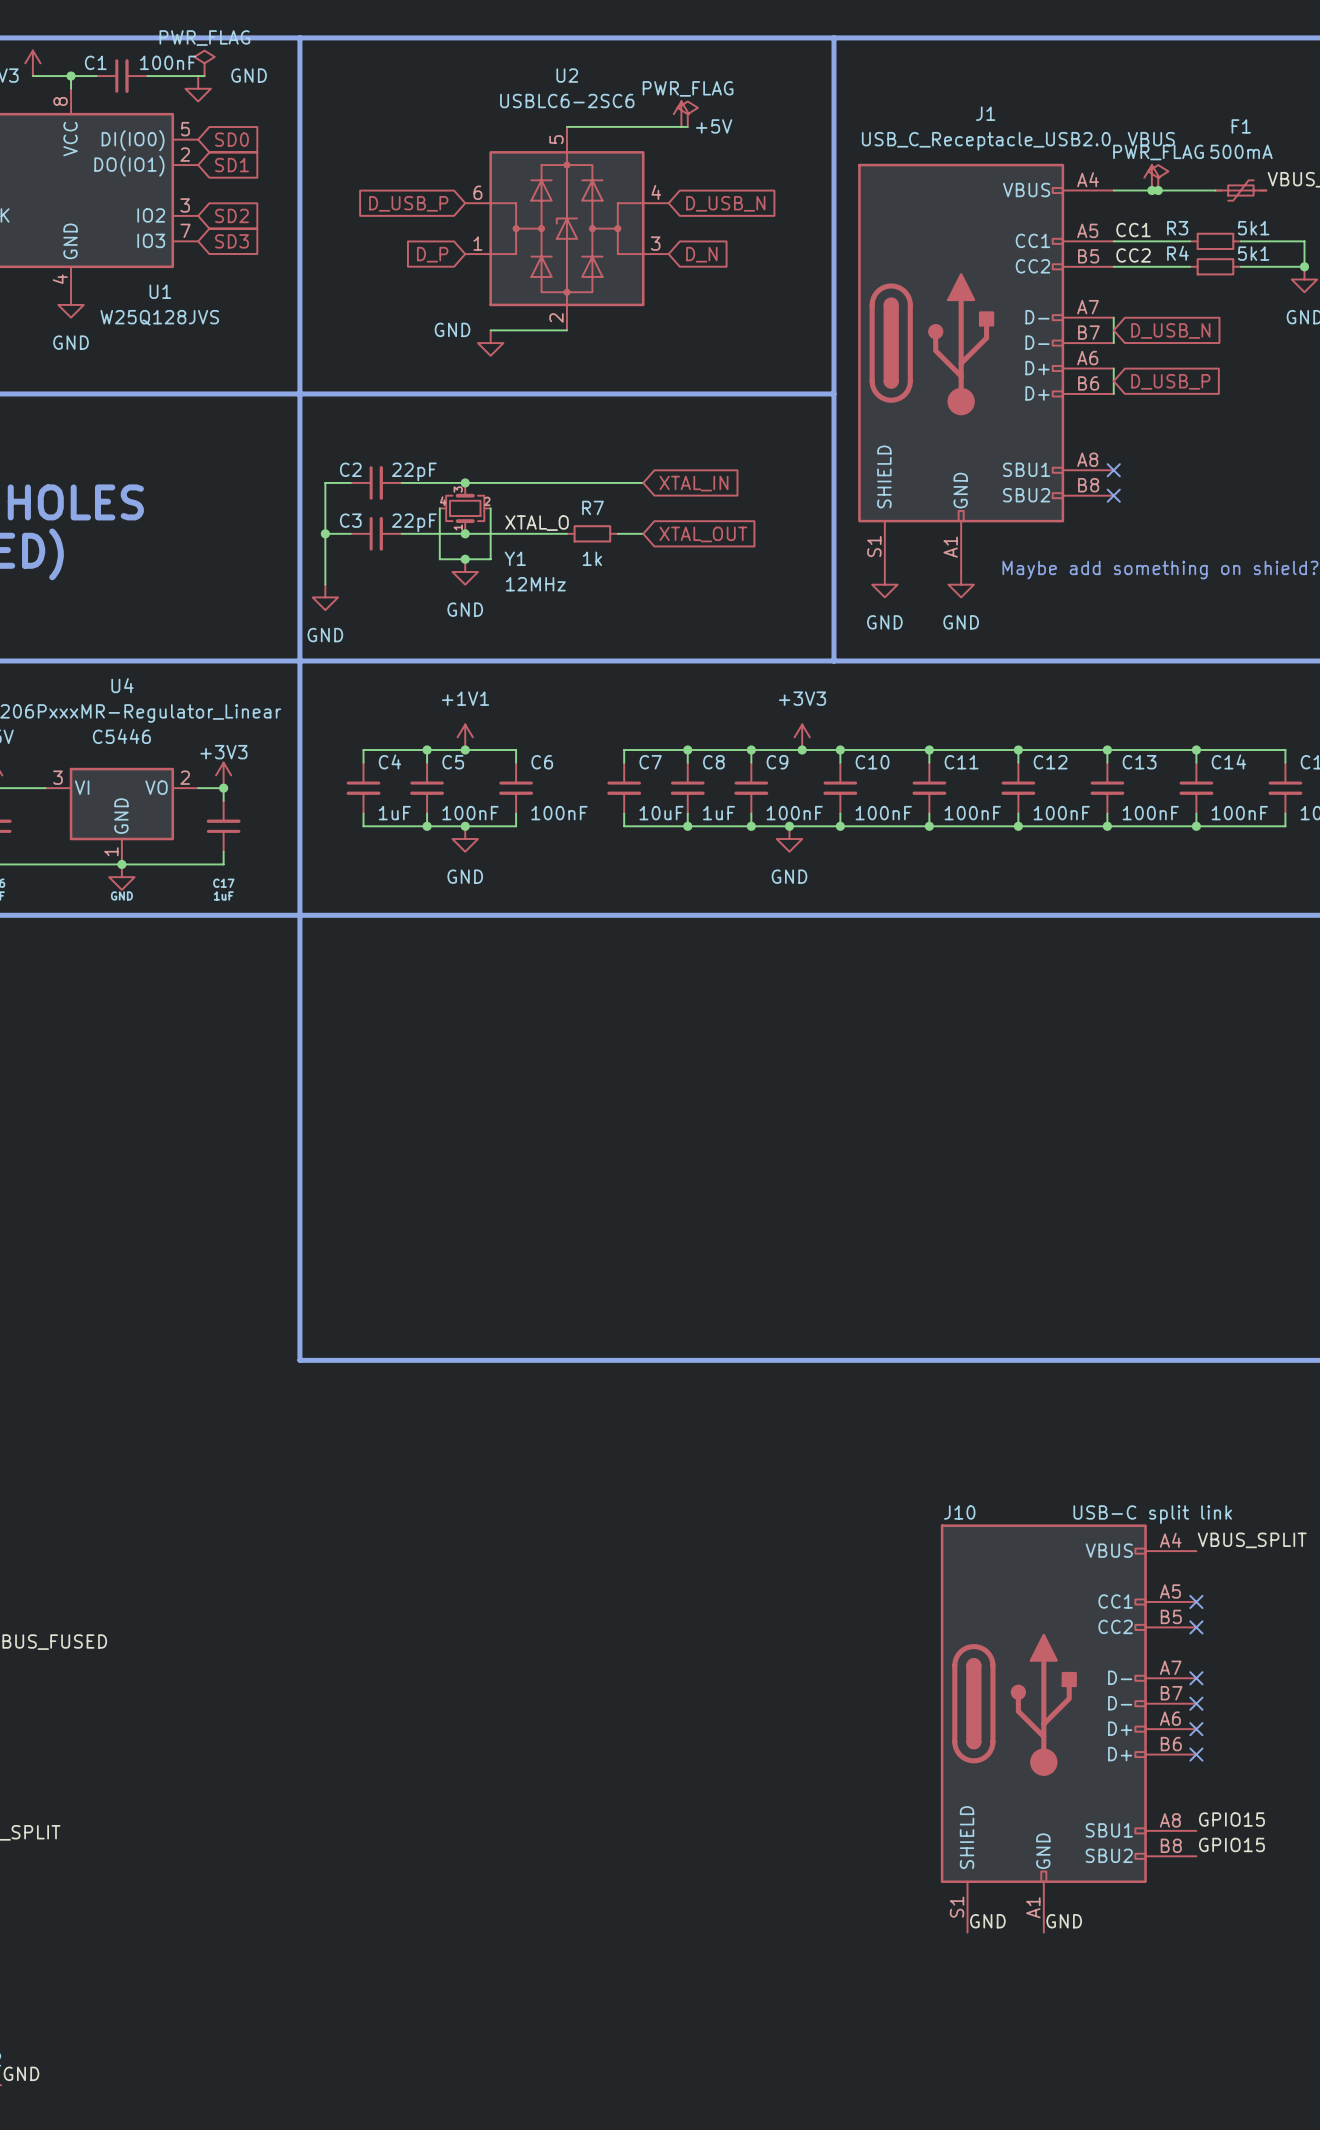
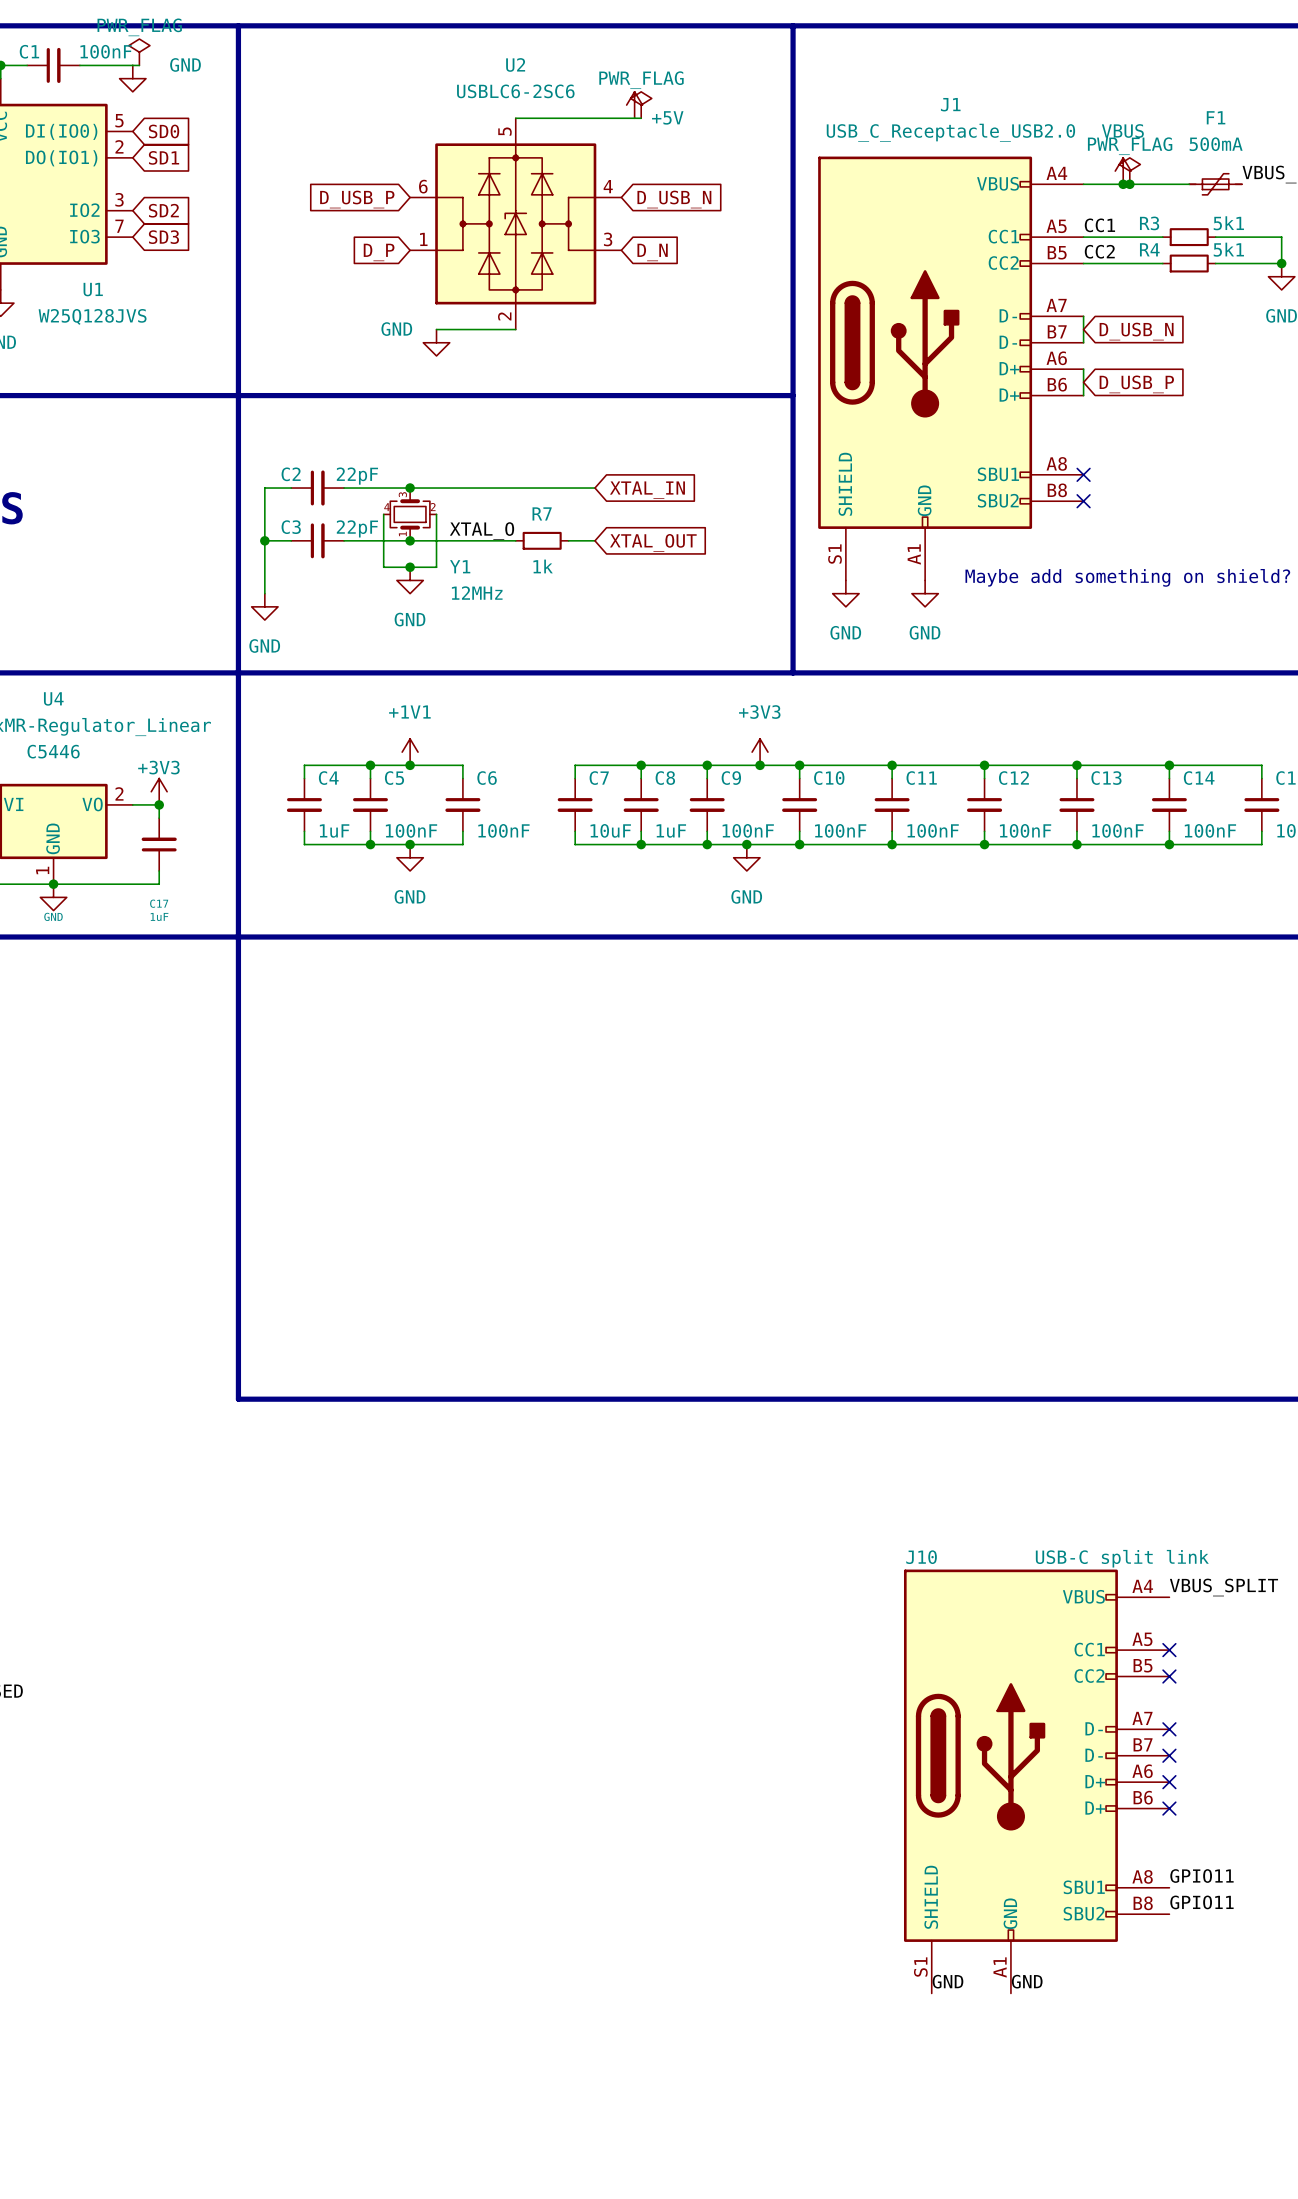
label: GPIO15 (1231, 1819) -> GPIO11 (1201, 1876)
label: GPIO15 (1231, 1844) -> GPIO11 (1201, 1902)

